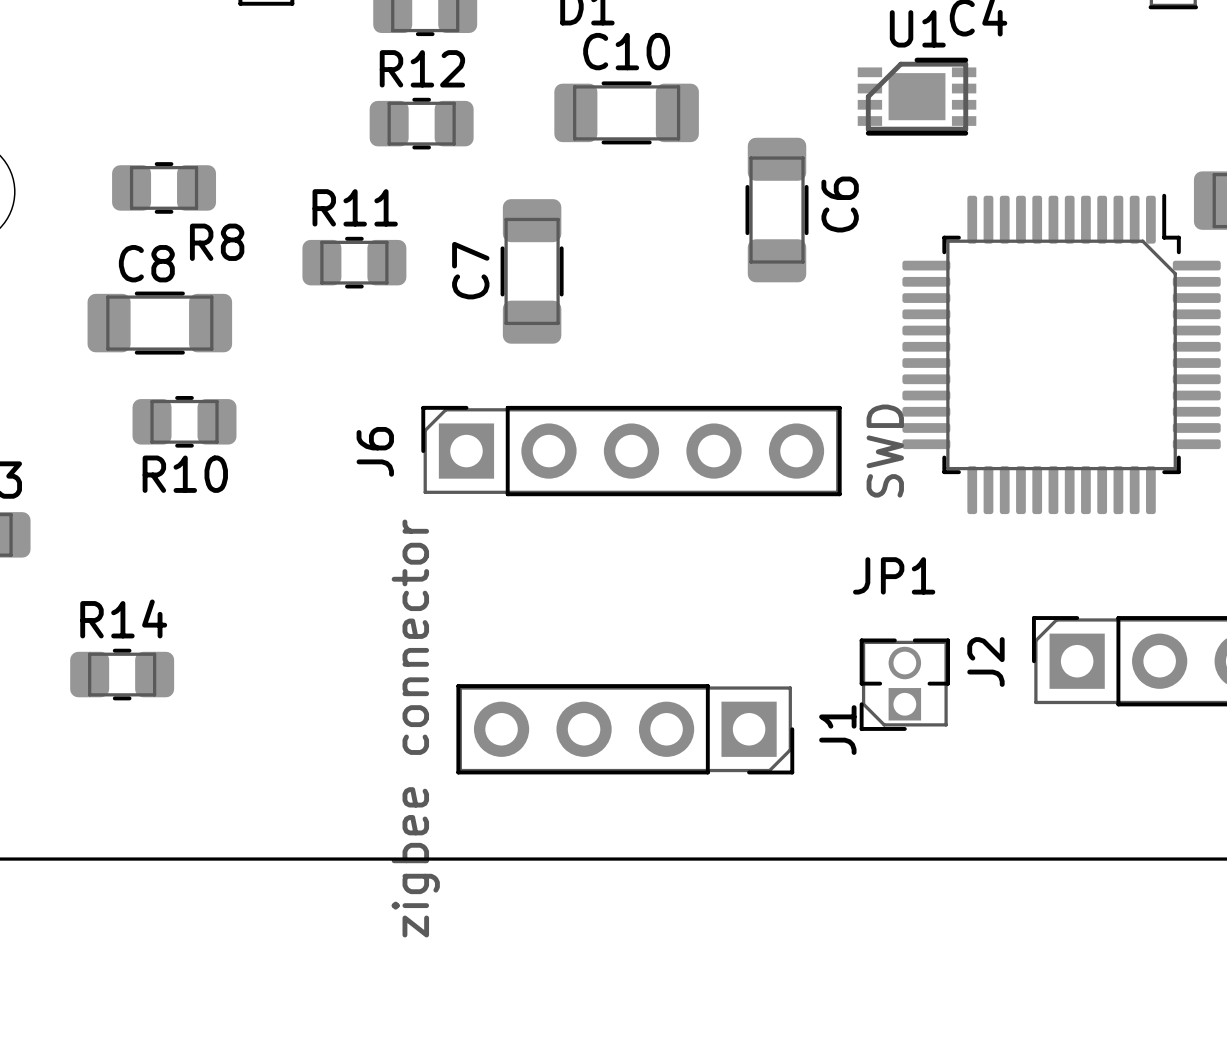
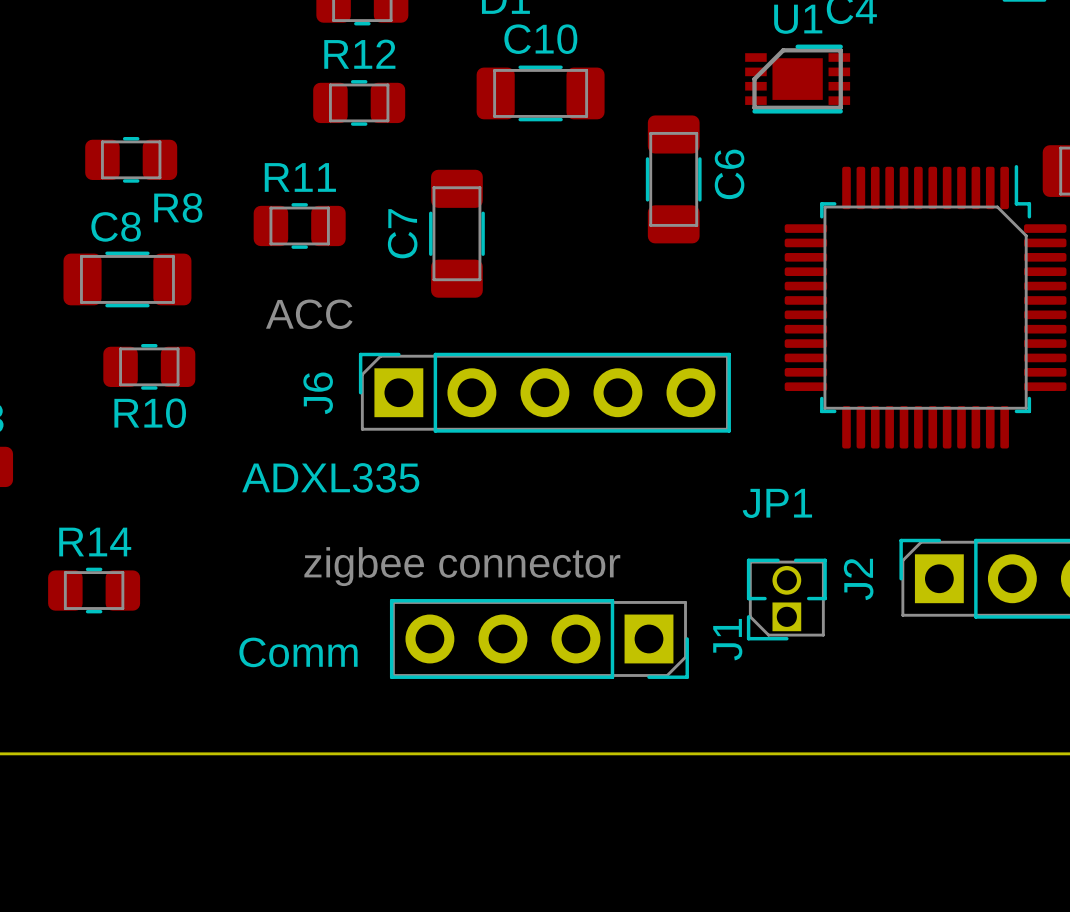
J6 value: SWD (885, 451) -> ACC (309, 314)
text: none -> ADXL335 (330, 477)
J1 value rotation: 0° (415, 728) -> 90° clockwise (462, 566)
text: none -> Comm (298, 652)

